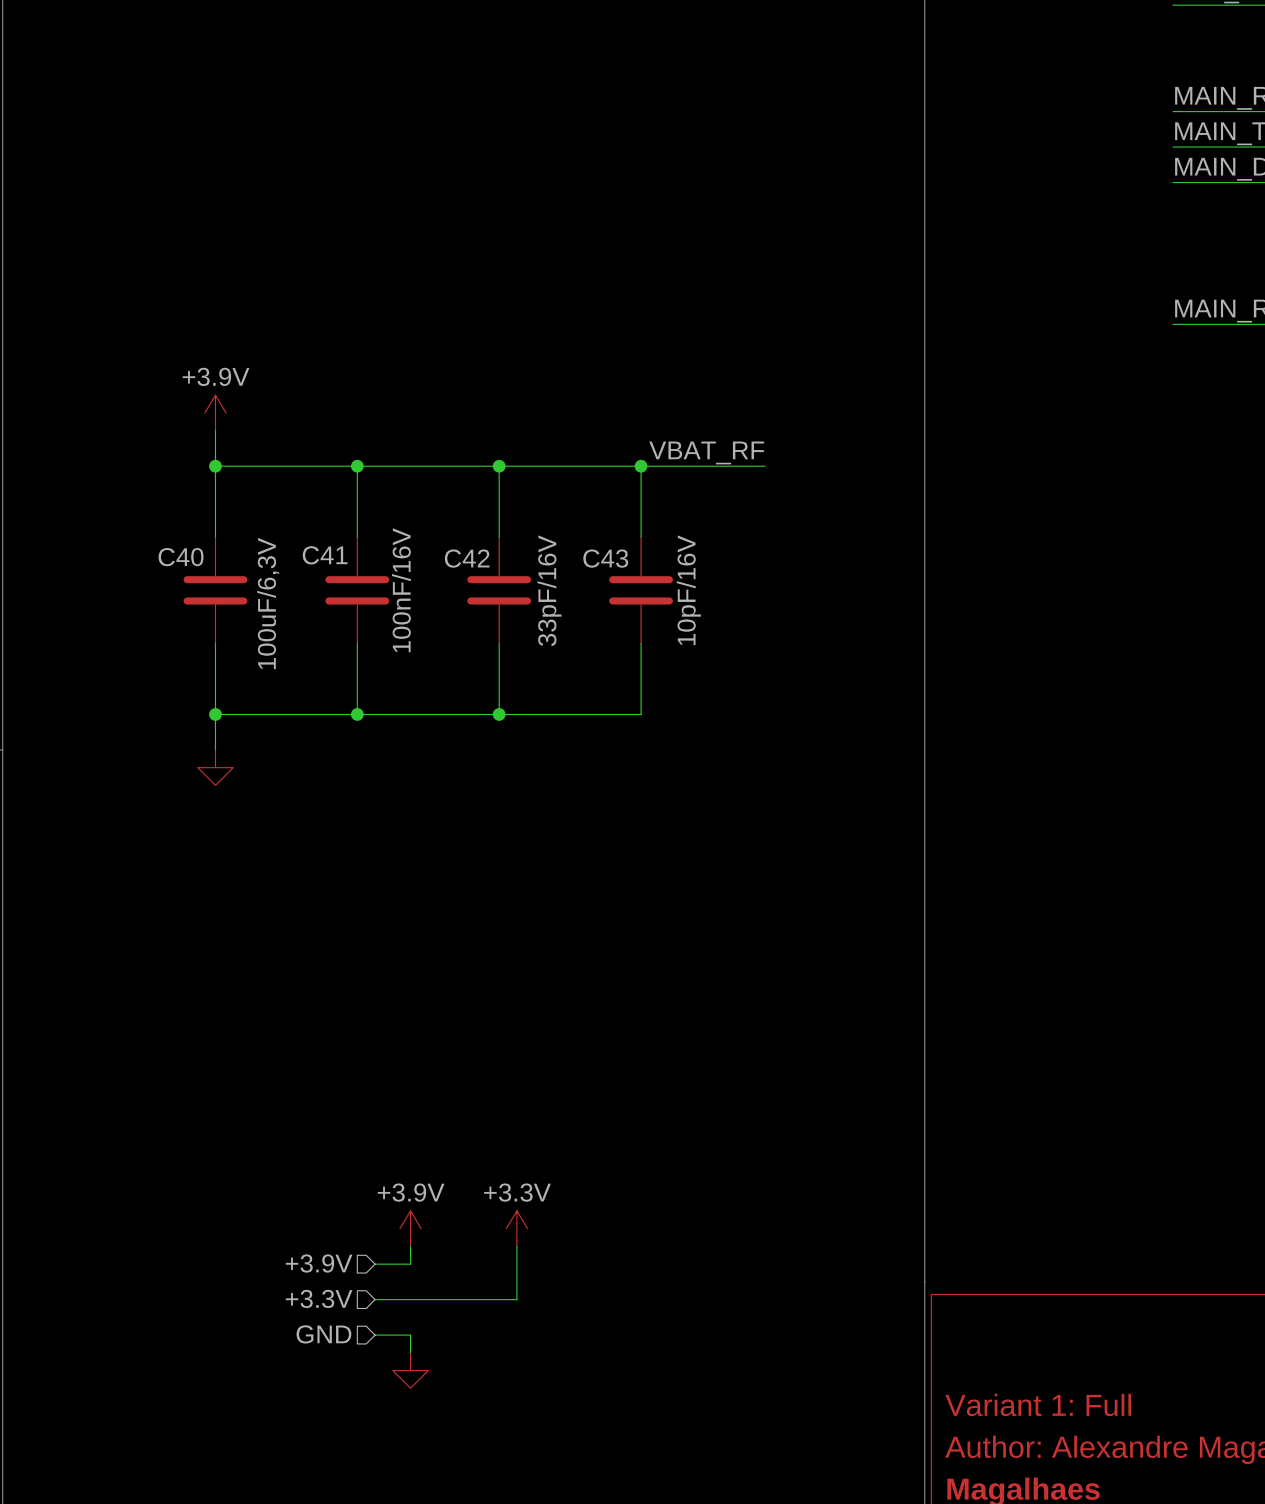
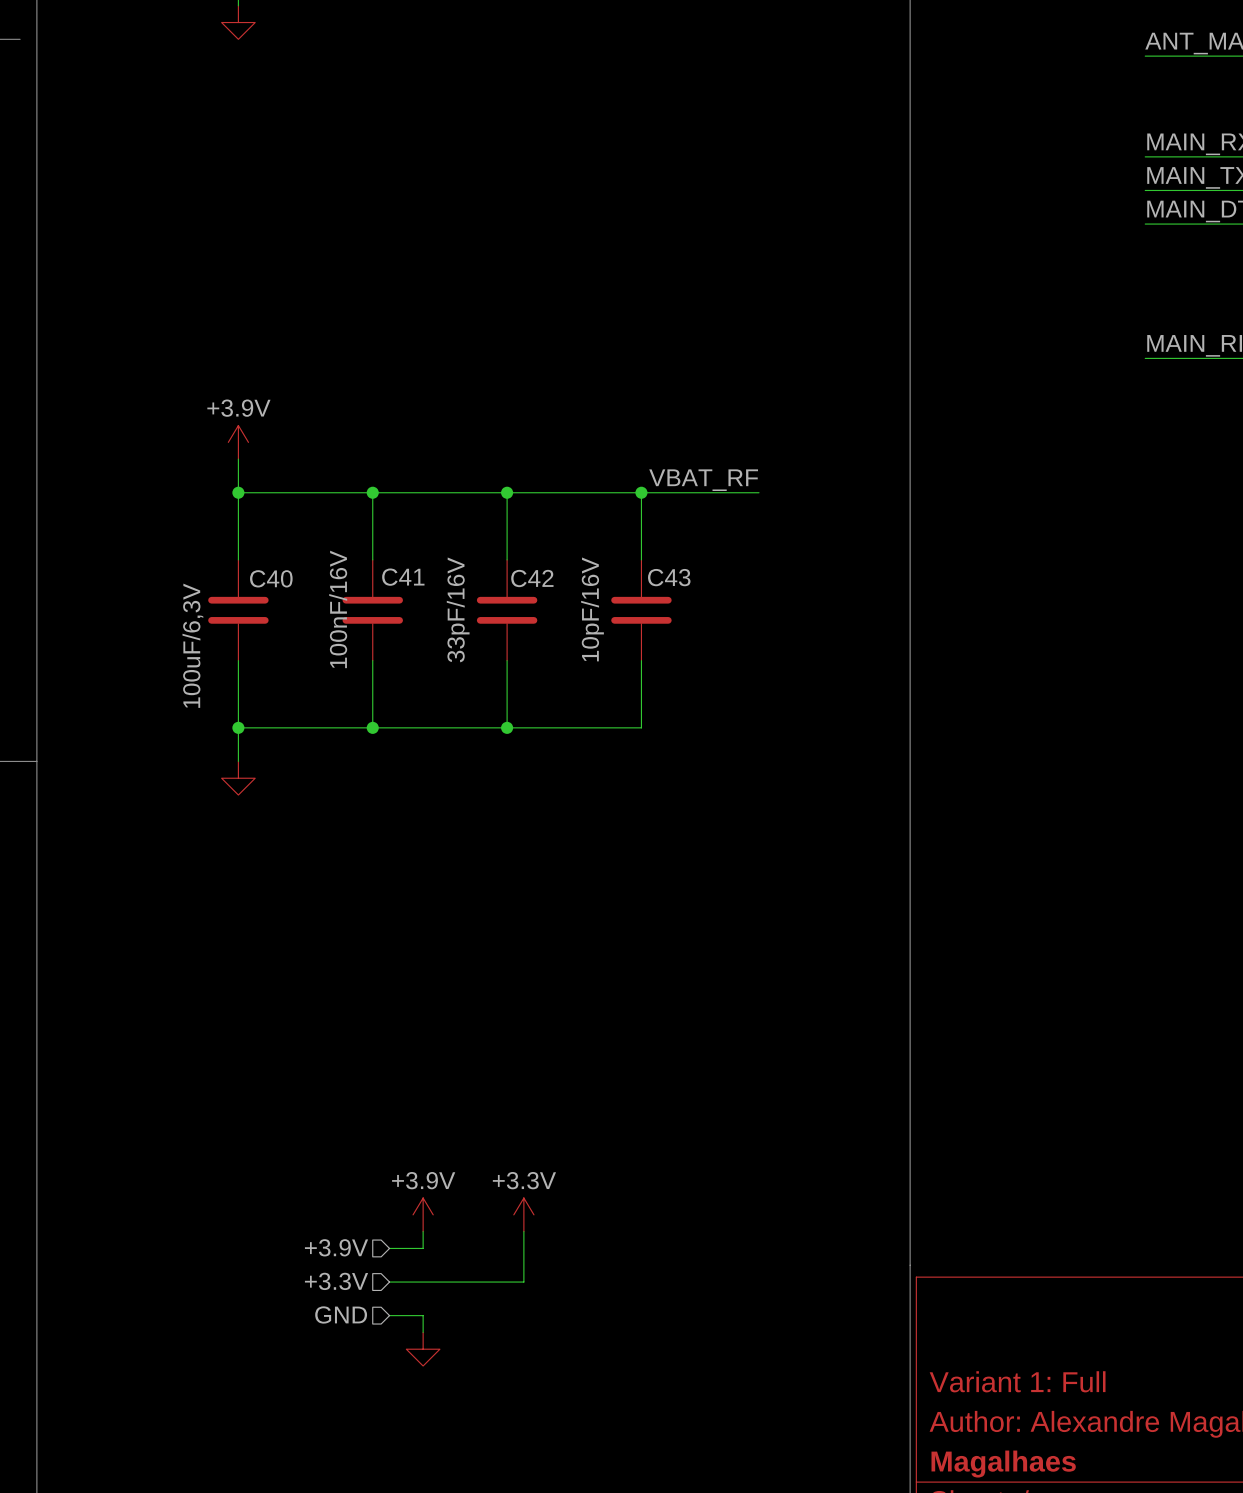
C41 name position: C41 (325, 555) -> C41 (403, 577)
C40 name position: C40 (181, 557) -> C40 (271, 578)
C42 name position: C42 (467, 558) -> C42 (532, 578)
C43 name position: C43 (605, 558) -> C43 (669, 577)
C41 value position: 100nF/16V (401, 590) -> 100nF/16V (338, 609)
C42 value position: 33pF/16V (549, 590) -> 33pF/16V (458, 609)
C43 value position: 10pF/16V (688, 590) -> 10pF/16V (592, 609)
C40 value position: 100uF/6,3V (268, 603) -> 100uF/6,3V (192, 645)

